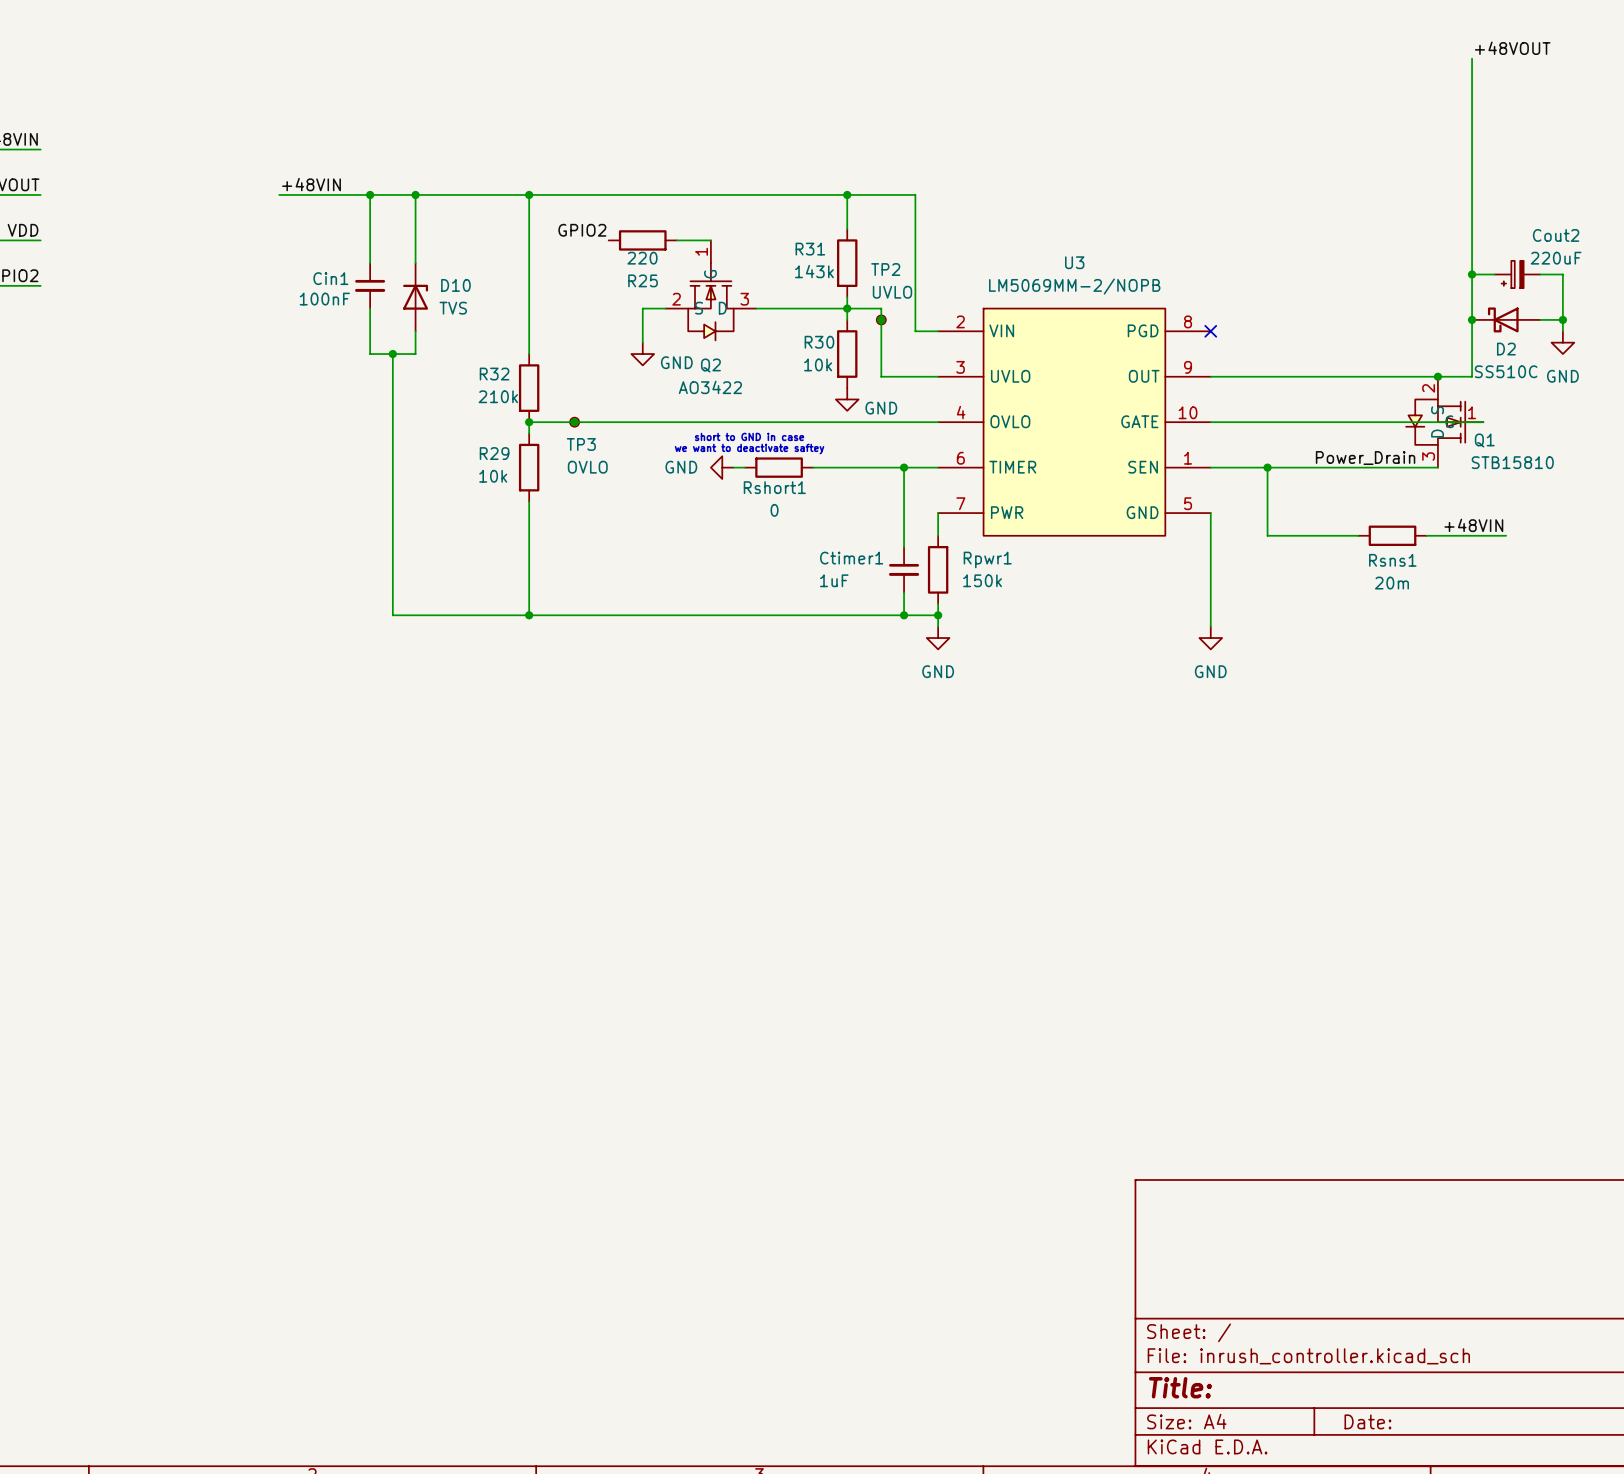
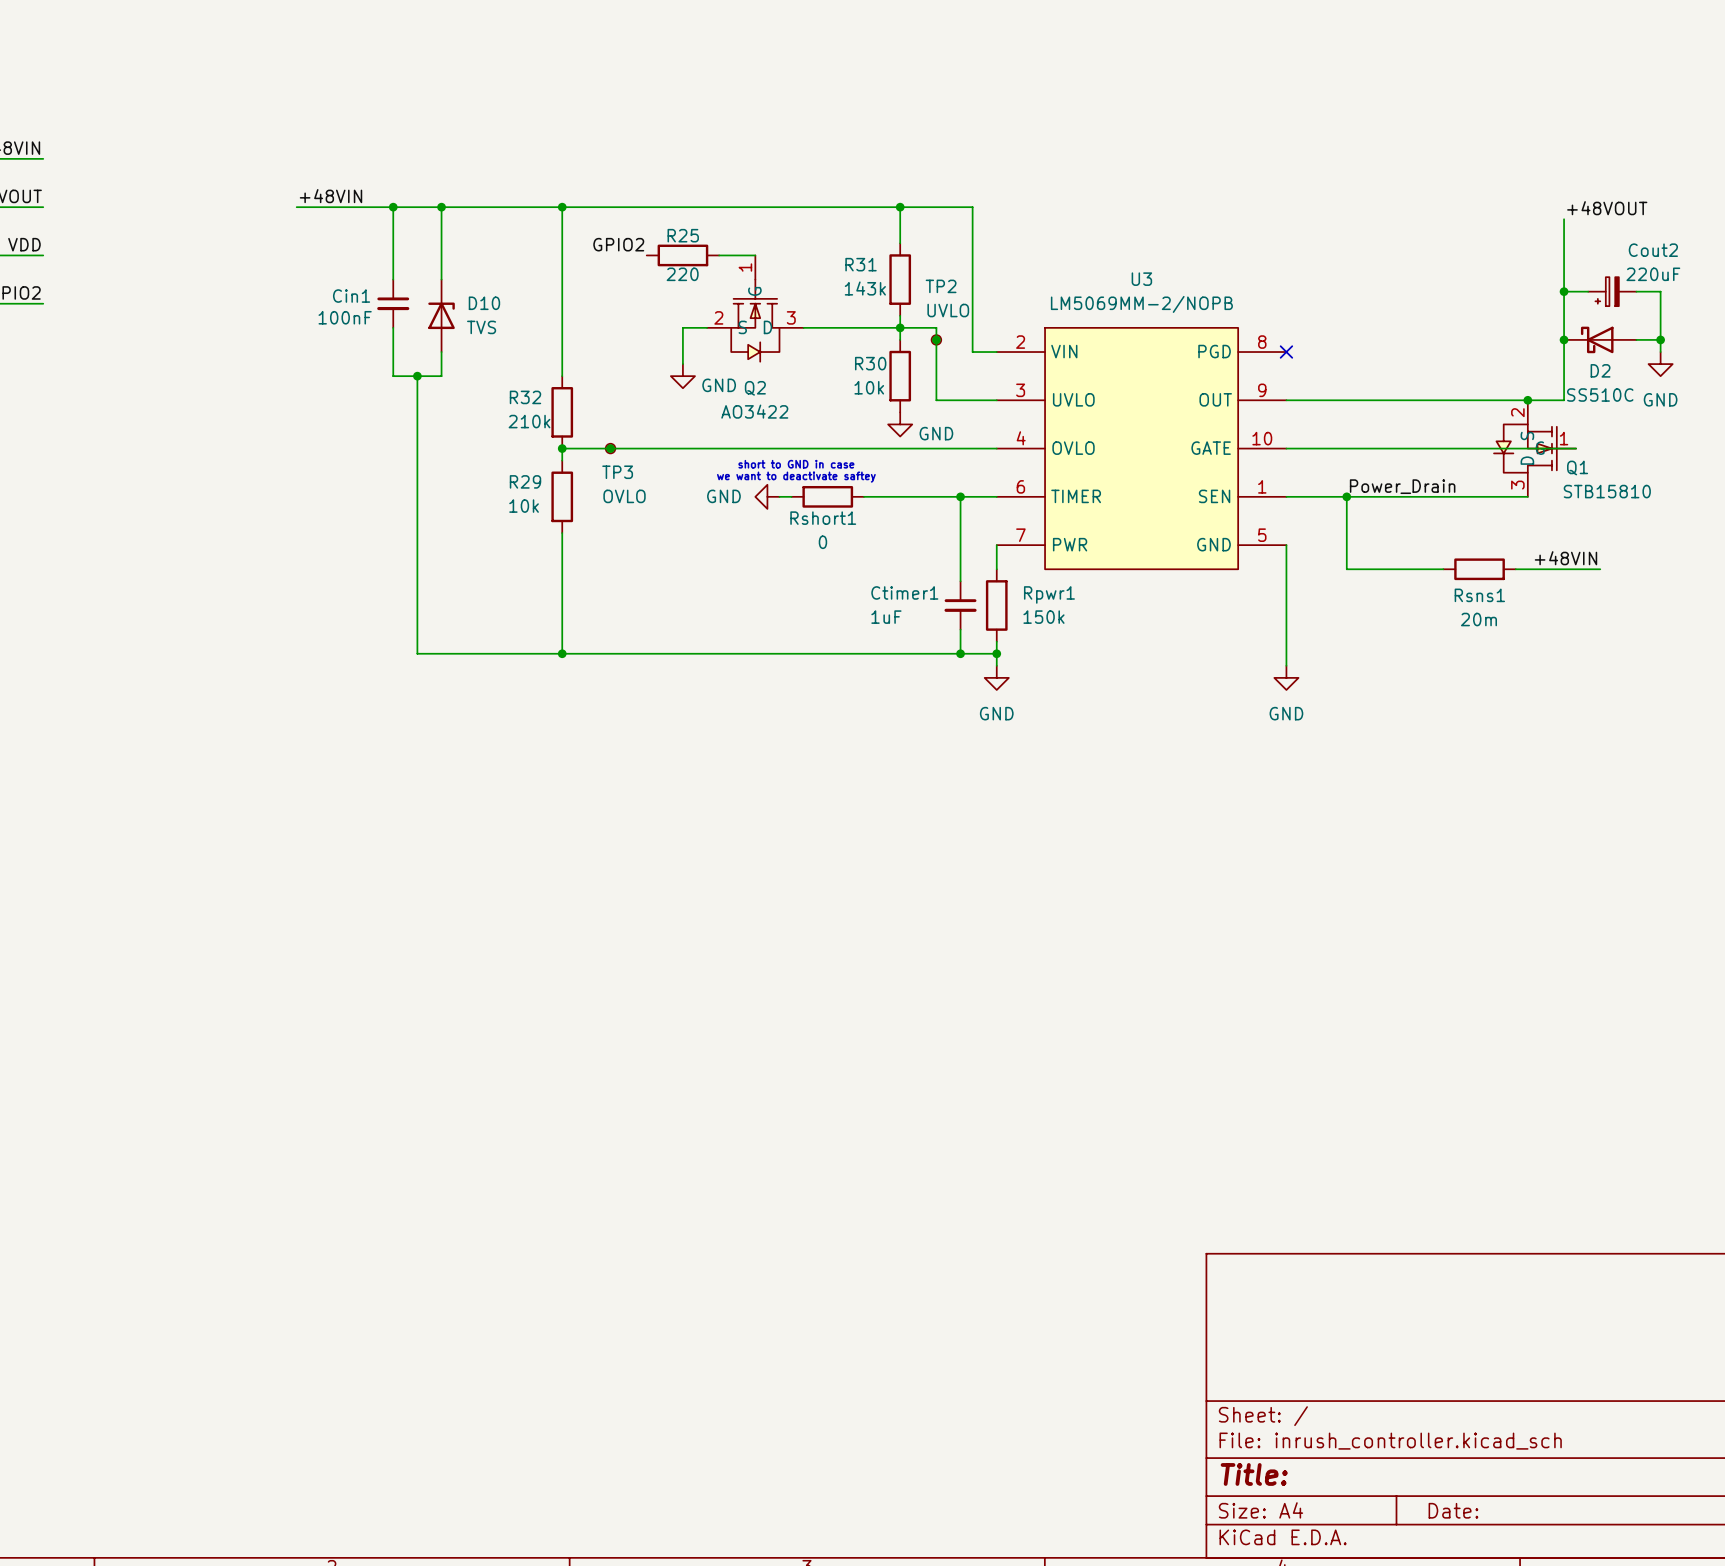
label position: +48VOUT (1512, 48) -> +48VOUT (1607, 208)
wire: (1472, 58) (1472, 206) -> none
R25 name position: R25 (643, 280) -> R25 (683, 235)
label position: Power_Drain (1365, 458) -> Power_Drain (1402, 486)

